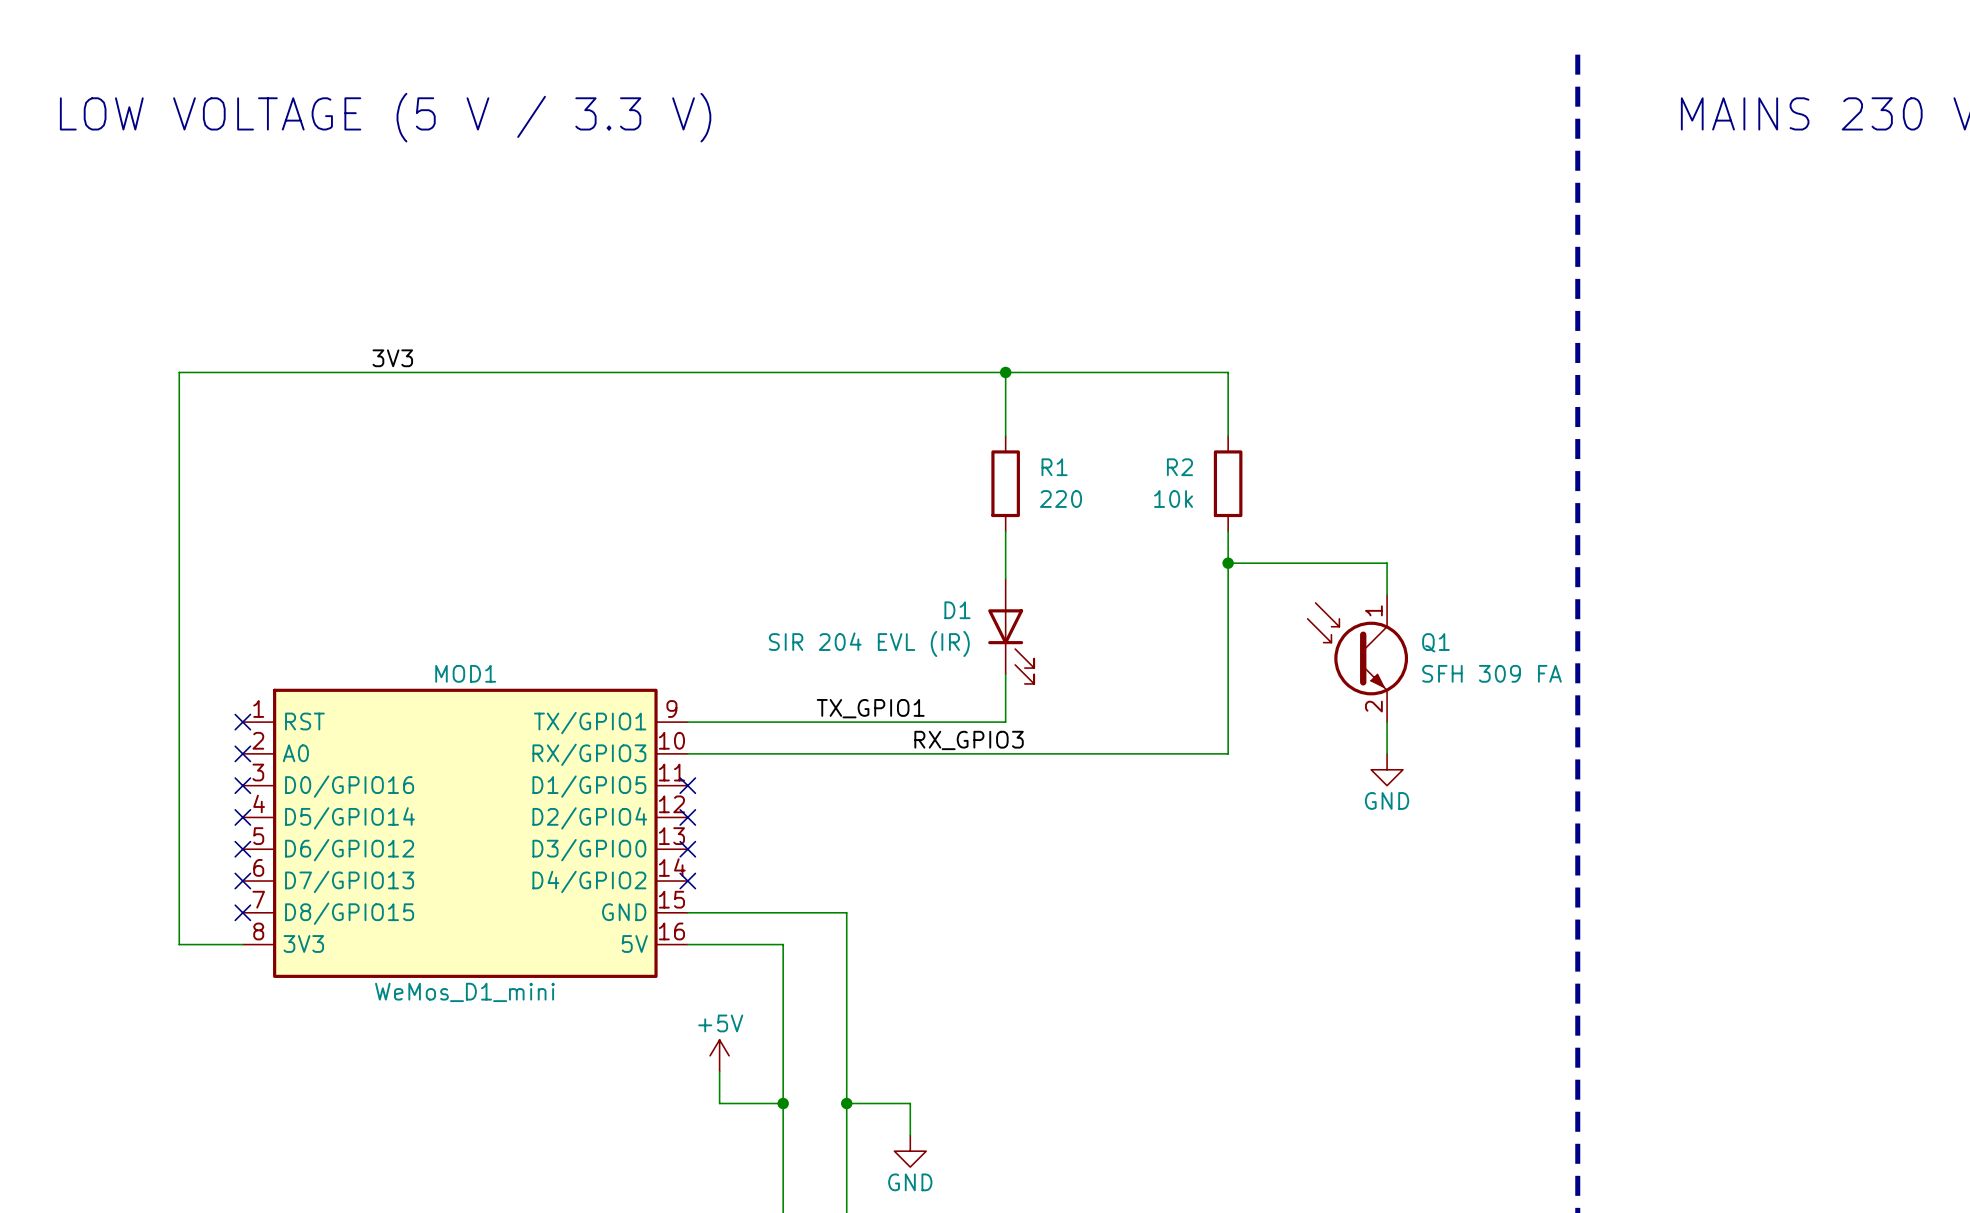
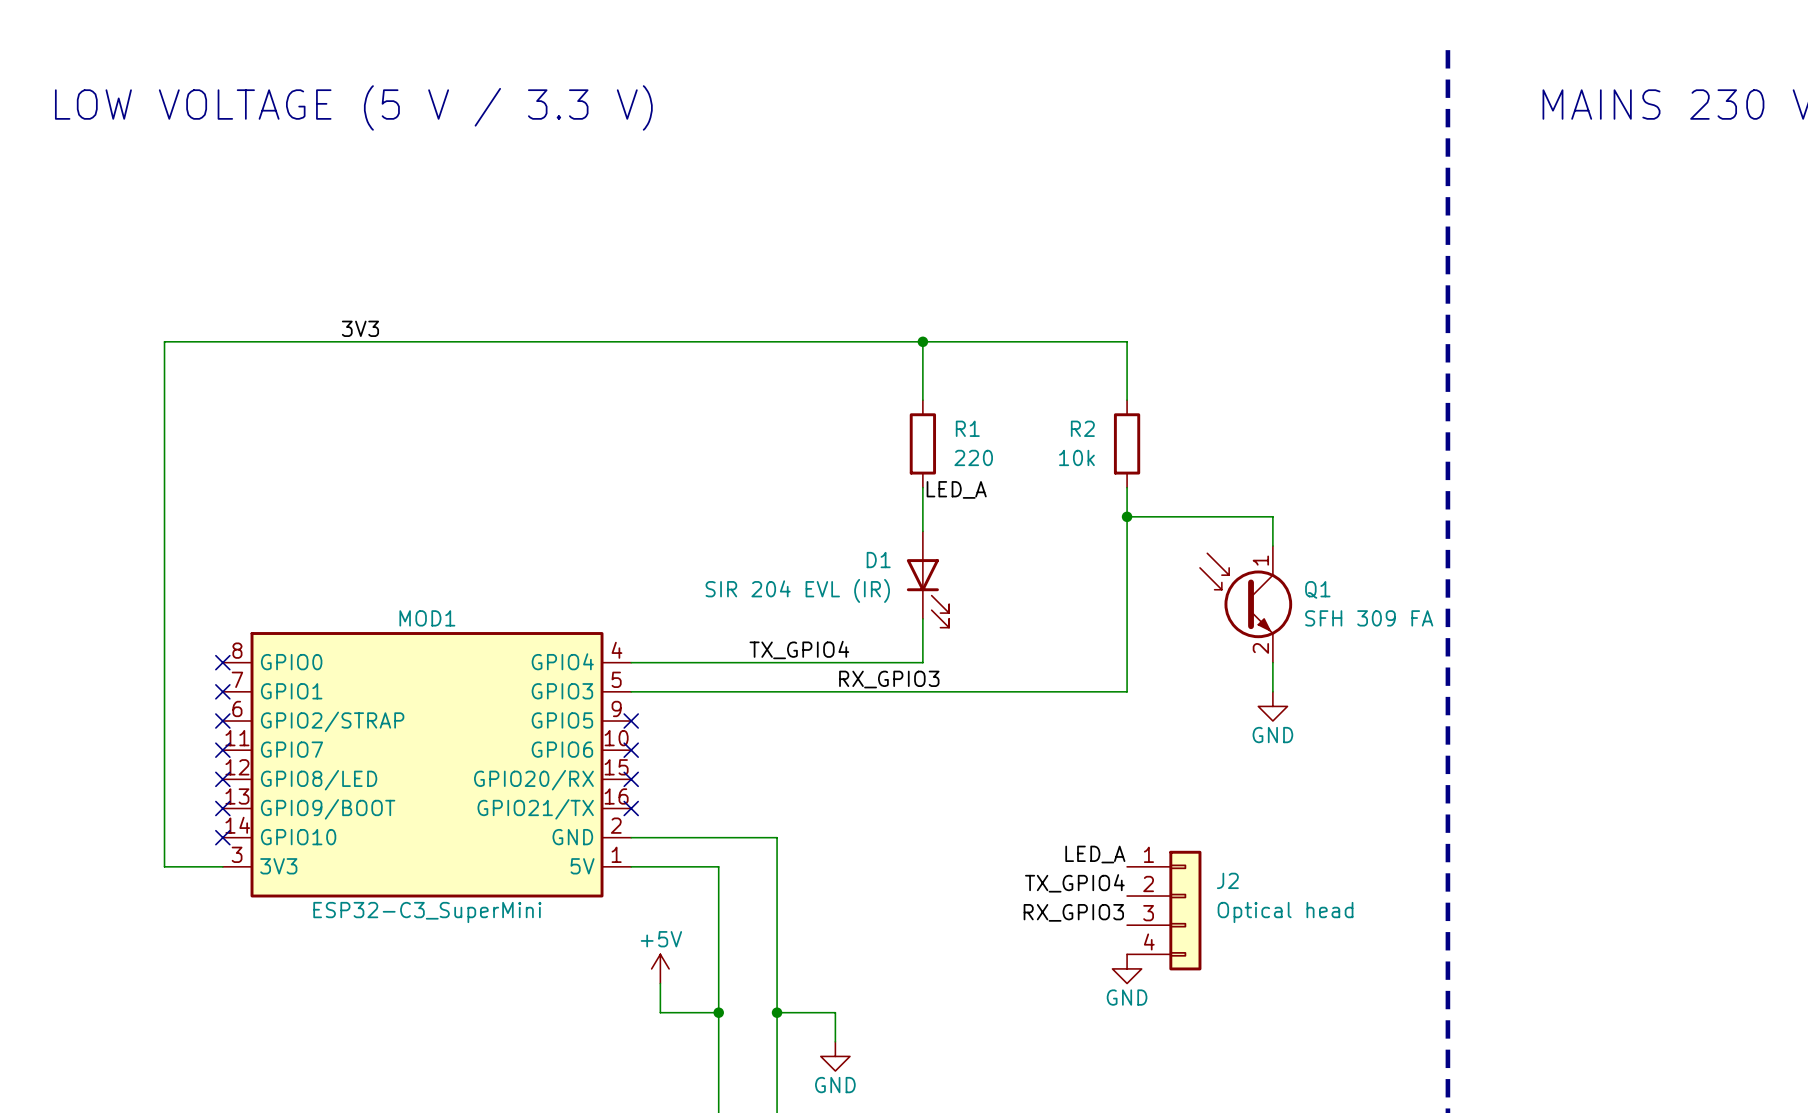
label: none -> LED_A (956, 489)
MOD1 symbol: [242, 688, 688, 978] -> [222, 632, 632, 898]
label: TX_GPIO1 (870, 708) -> TX_GPIO4 (799, 650)
label: none -> LED_A (1095, 854)
label: none -> TX_GPIO4 (1074, 883)
MOD1 value: WeMos_D1_mini (464, 992) -> ESP32-C3_SuperMini (427, 912)
J2: none -> Optical head (1164, 910)
label: none -> RX_GPIO3 (1073, 912)
power symbol: none -> GND (1127, 968)

